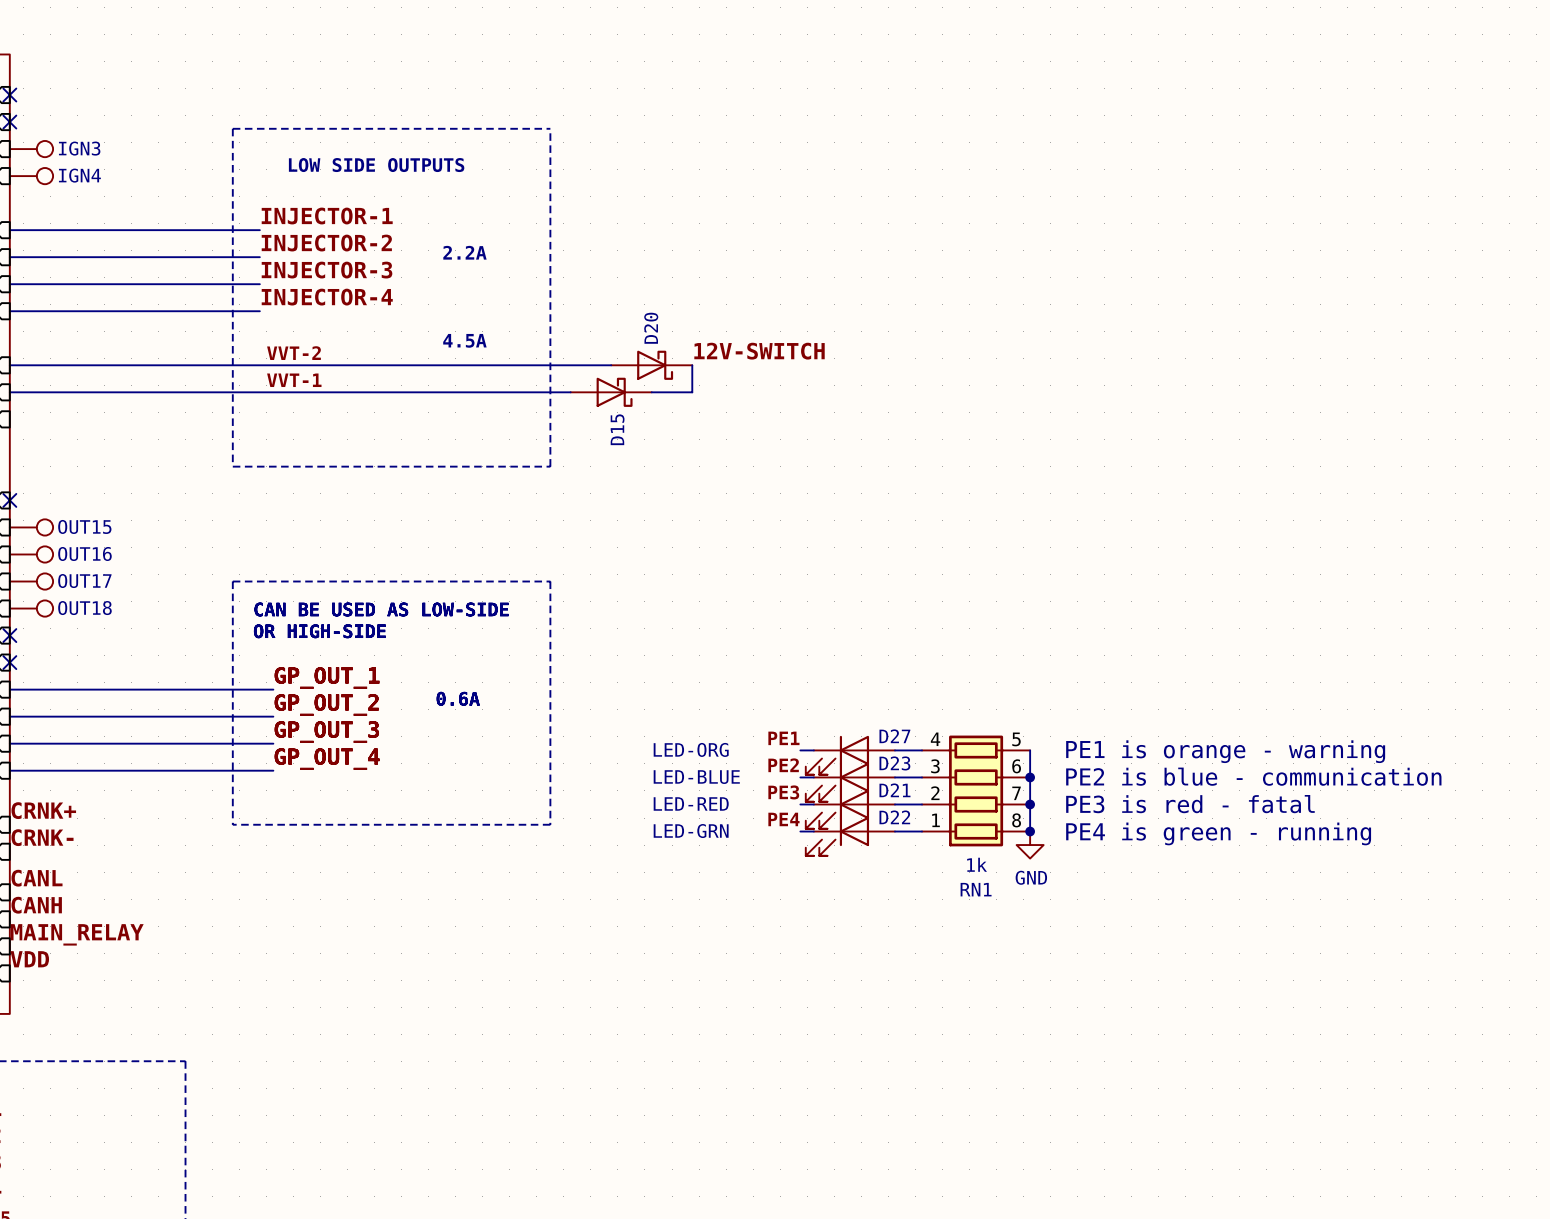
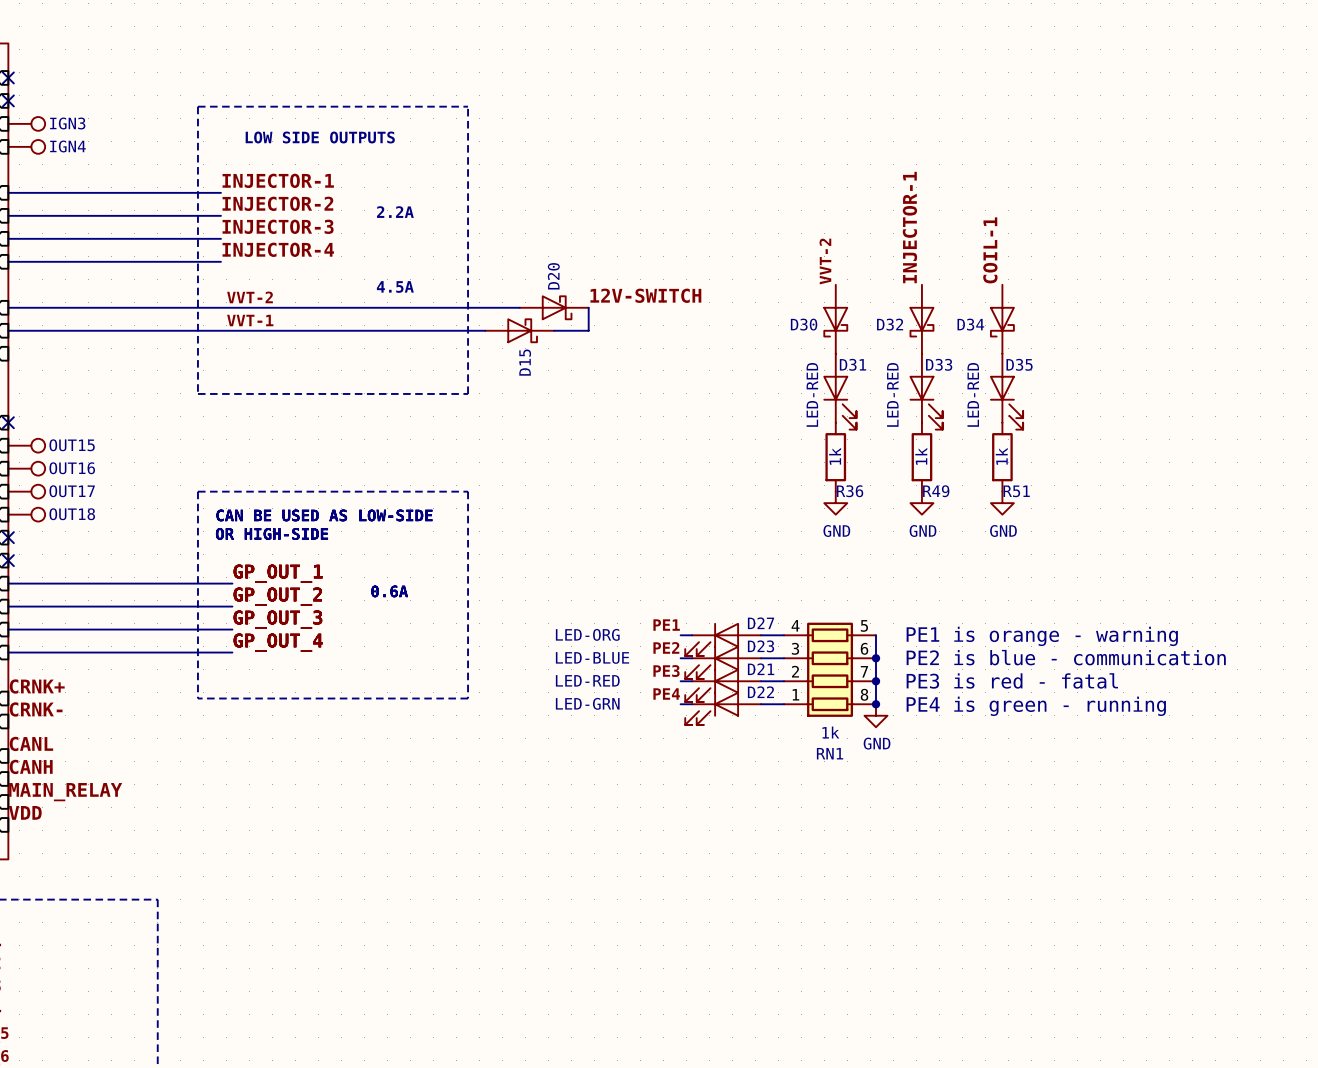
label: none -> INJECTOR-1 (909, 227)
label: none -> COIL-1 (990, 250)
label: none -> VVT-2 (825, 261)
D30: none -> (835, 319)
D32: none -> (921, 319)
D34: none -> (1002, 319)
D31: none -> LED-RED (839, 391)
D33: none -> LED-RED (926, 391)
D35: none -> LED-RED (1006, 391)
R36: none -> 1k (835, 457)
R49: none -> 1k (921, 457)
R51: none -> 1k (1002, 457)
power symbol: none -> GND (835, 503)
power symbol: none -> GND (921, 503)
power symbol: none -> GND (1002, 503)

